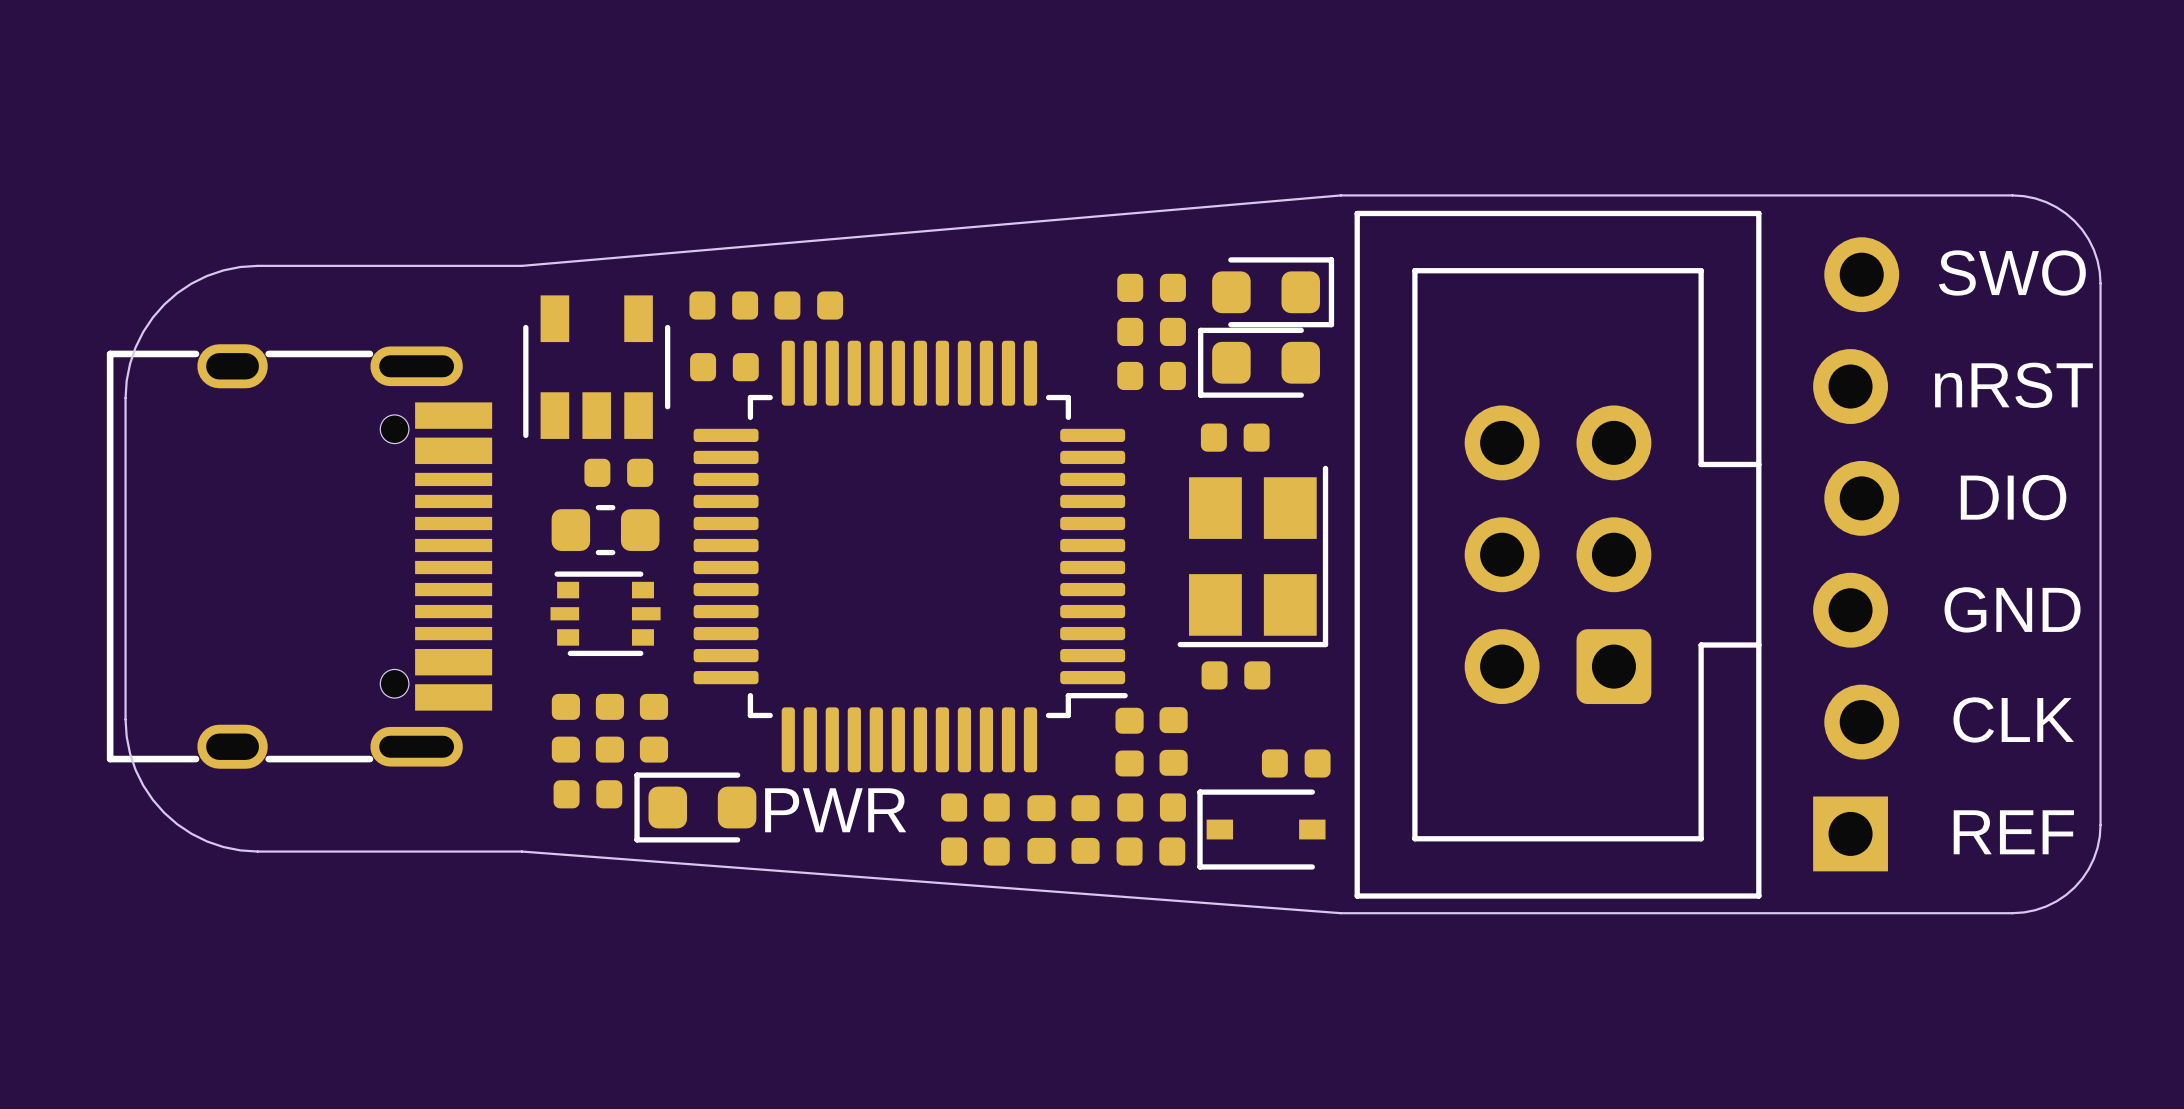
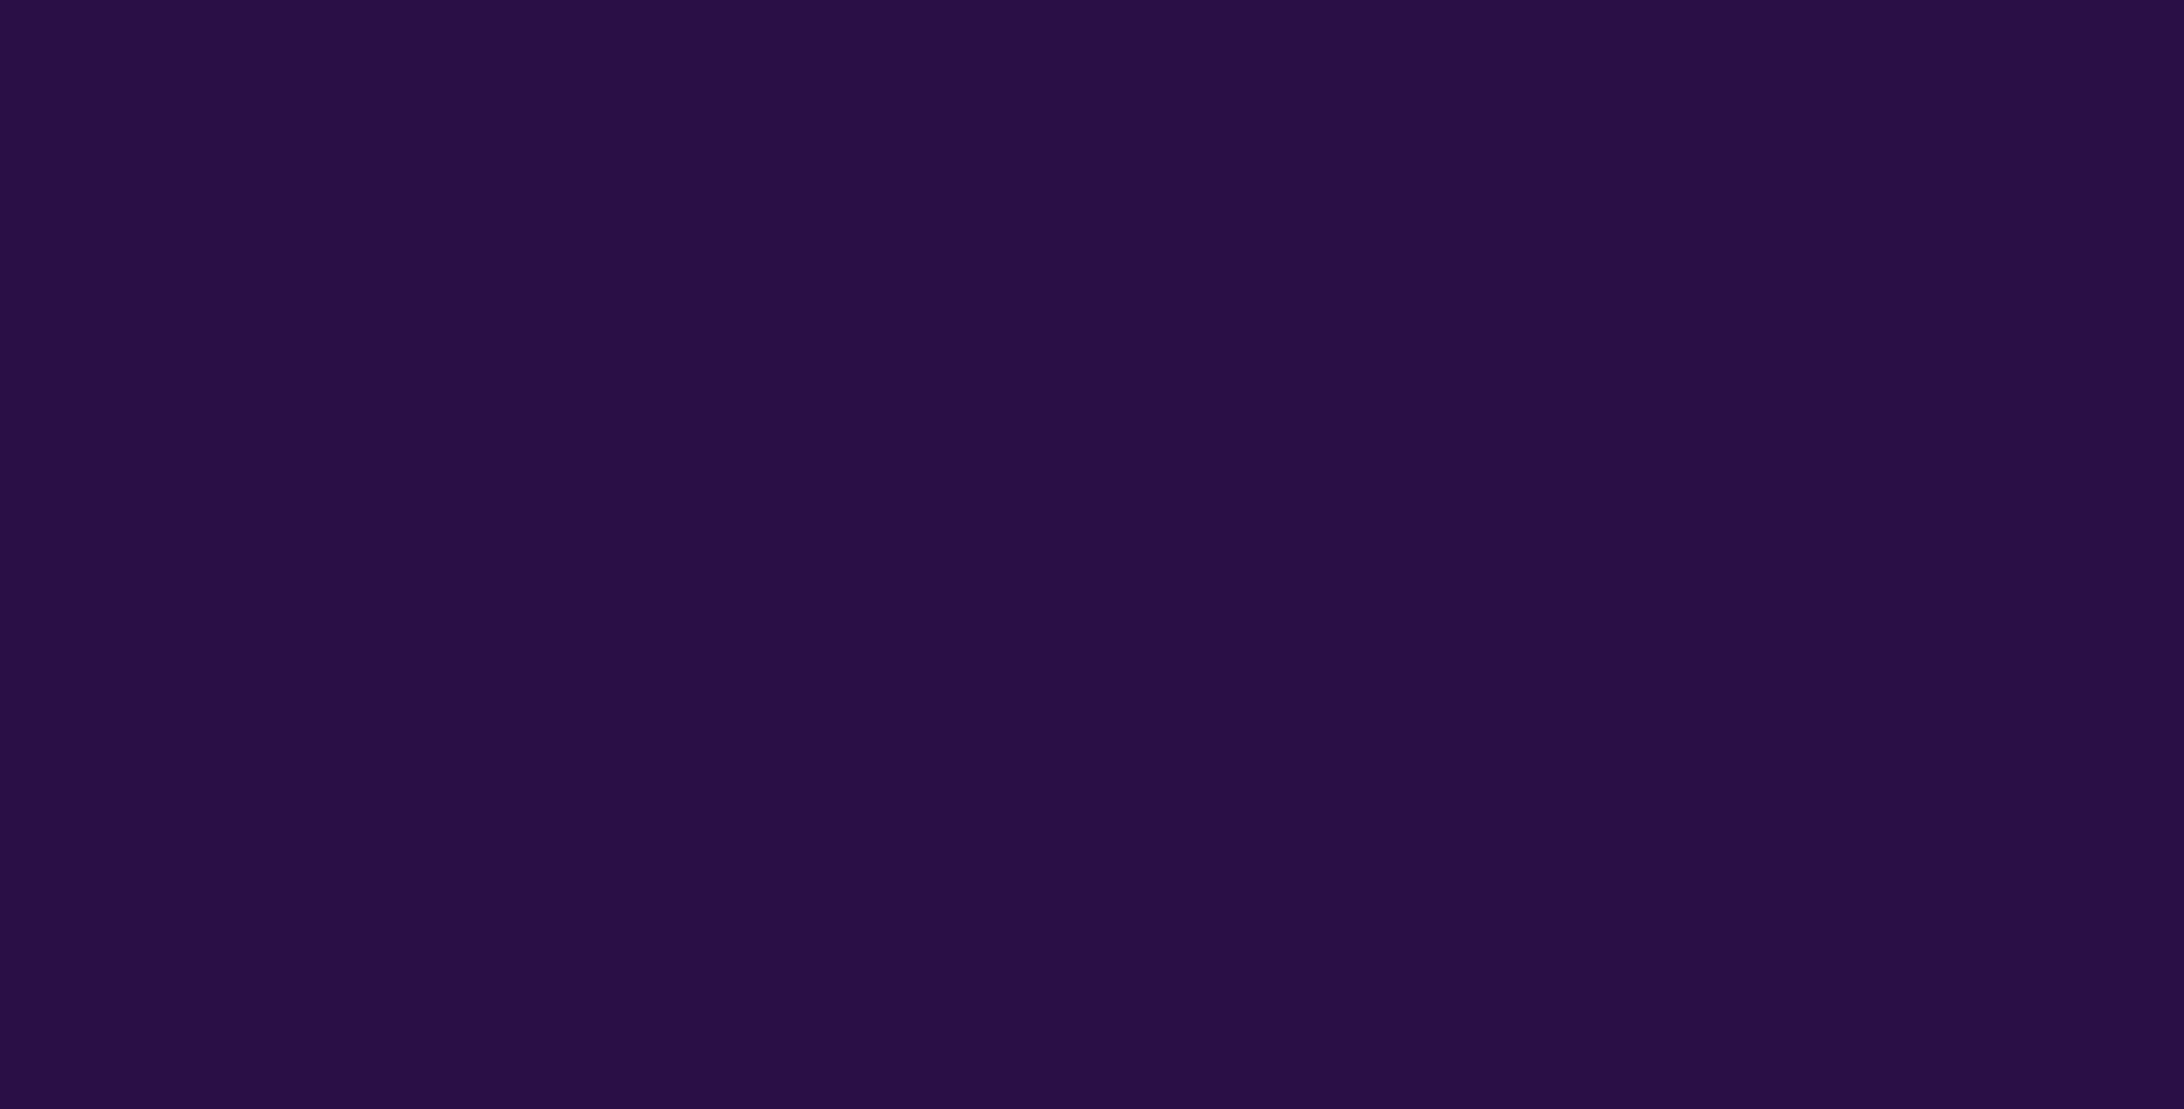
board edge: (1340, 195) (2012, 195) (2035, 198) (2046, 202) (2066, 213) (2074, 221) (2082, 229) (2093, 249) (2099, 271) (2100, 283) (2100, 825) (2099, 836) (2093, 858) (2082, 878) (2074, 887) (2066, 894) (2046, 906) (2035, 910) (2012, 913) (1340, 913) (521, 851) (257, 851) (223, 847) (191, 833) (164, 812) (143, 785) (135, 769) (126, 736) (125, 719) (126, 380) (135, 347) (152, 317) (177, 293) (207, 275) (223, 270) (257, 265) (521, 265) (1340, 195) -> none
text: SWO (2012, 273) -> none
part: (1151, 287) -> none
part: (1273, 292) -> none
part: (723, 305) -> none
part: (808, 305) -> none
part: (1151, 331) -> none
part: (1259, 362) -> none
part: (596, 367) -> none
part: (724, 367) -> none
part: (1151, 375) -> none
text: nRST (2013, 385) -> none
part: (1235, 437) -> none
part: (618, 472) -> none
text: DIO (2013, 497) -> none
part: (605, 530) -> none
part: (1558, 554) -> none
part: (1856, 554) -> none
part: (299, 556) -> none
part: (910, 556) -> none
part: (1252, 556) -> none
text: GND (2012, 609) -> none
part: (605, 613) -> none
part: (1235, 675) -> none
text: CLK (2013, 719) -> none
part: (565, 728) -> none
part: (609, 728) -> none
part: (653, 728) -> none
part: (1173, 741) -> none
part: (1129, 742) -> none
part: (1296, 763) -> none
part: (587, 794) -> none
part: (695, 807) -> none
part: (975, 807) -> none
part: (1151, 807) -> none
text: PWR (835, 810) -> none
part: (1041, 829) -> none
part: (1085, 829) -> none
part: (1261, 829) -> none
text: REF (2013, 832) -> none
part: (975, 851) -> none
part: (1150, 851) -> none

